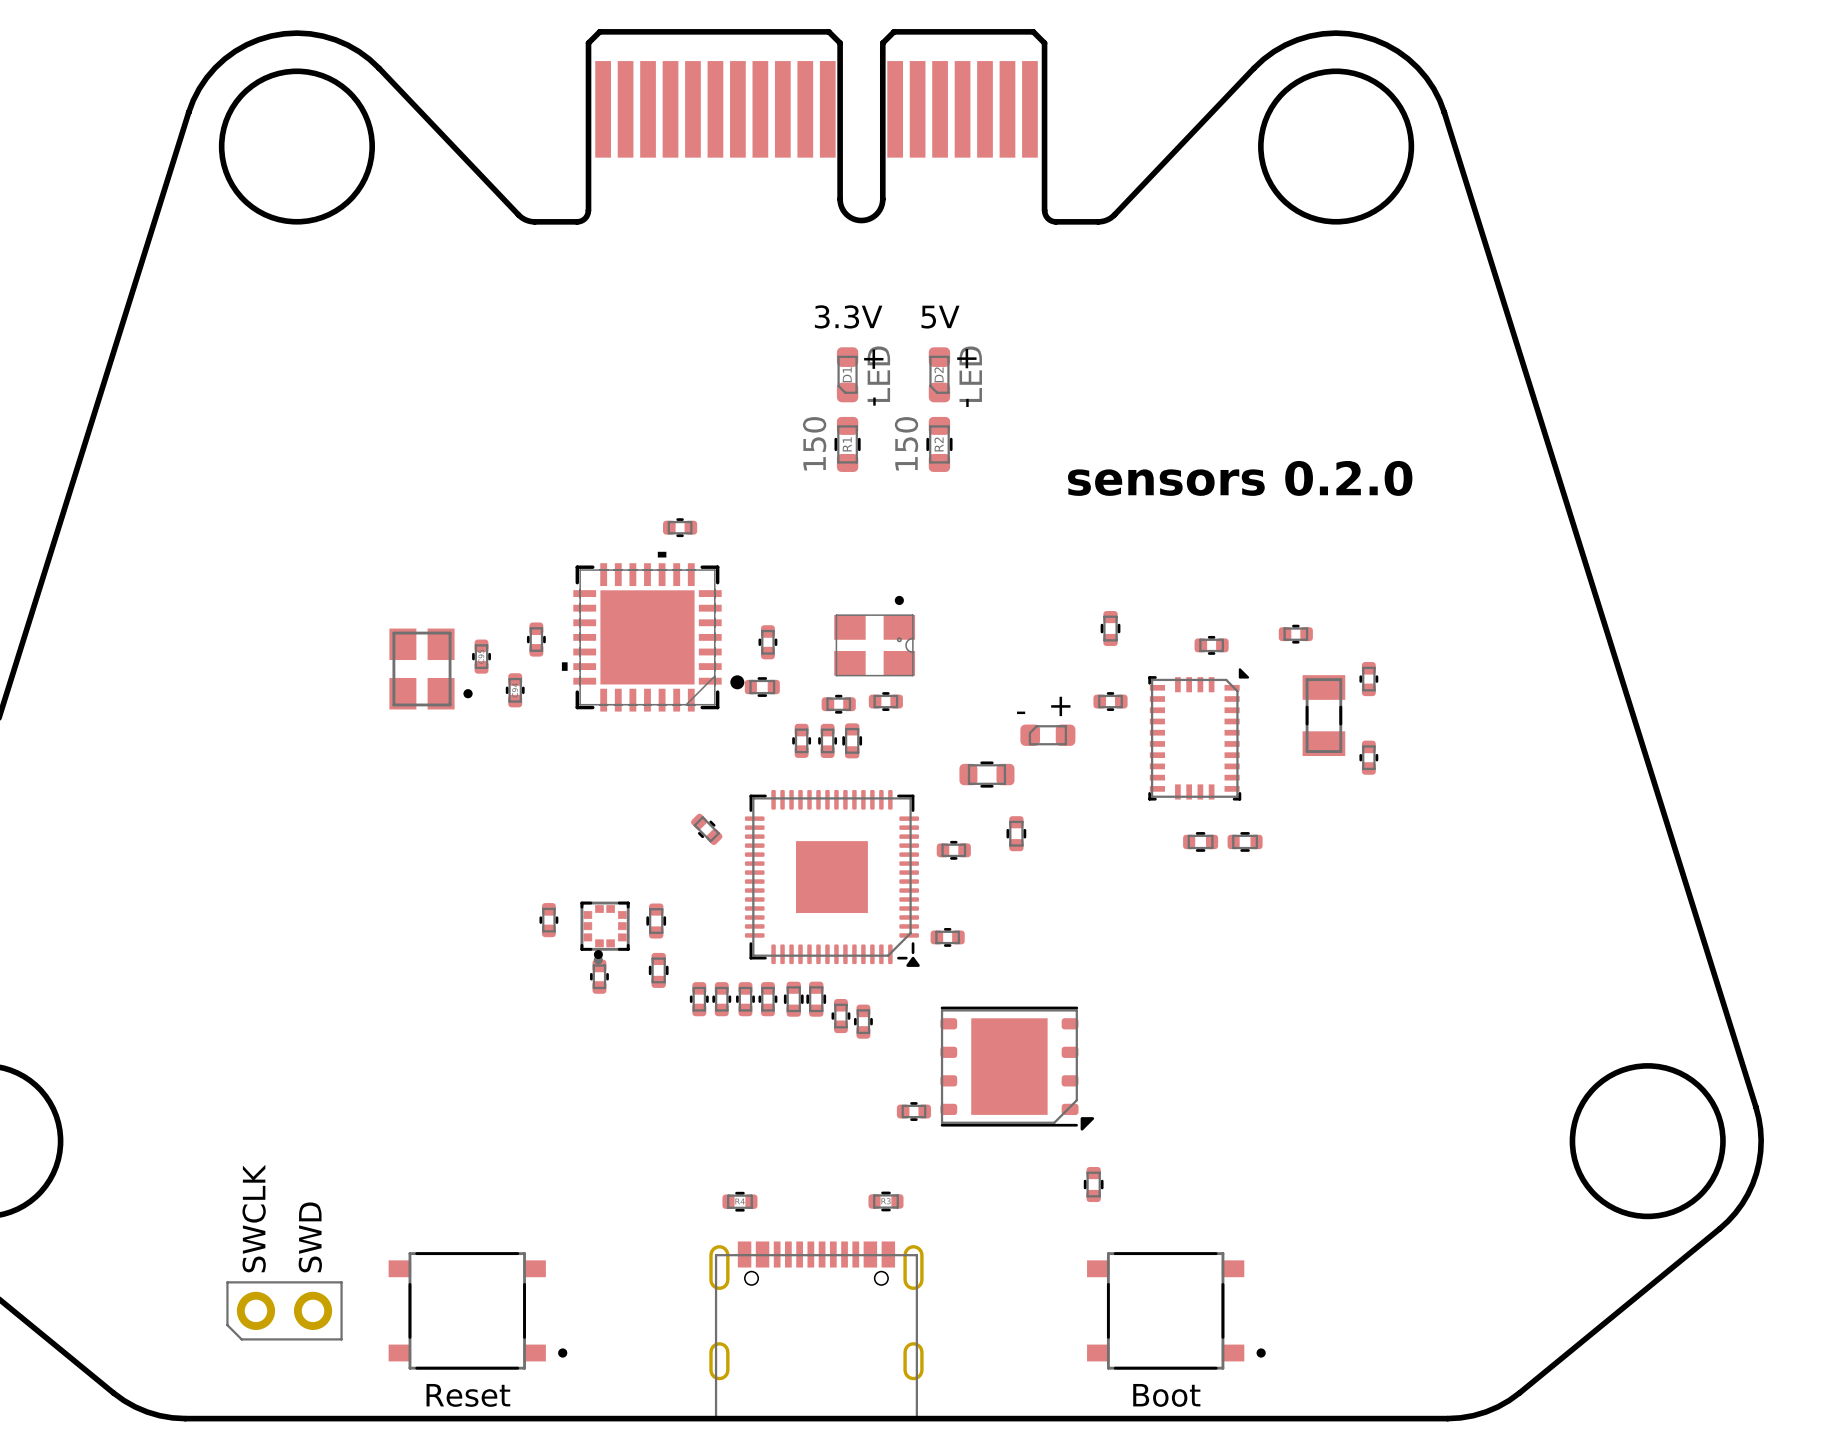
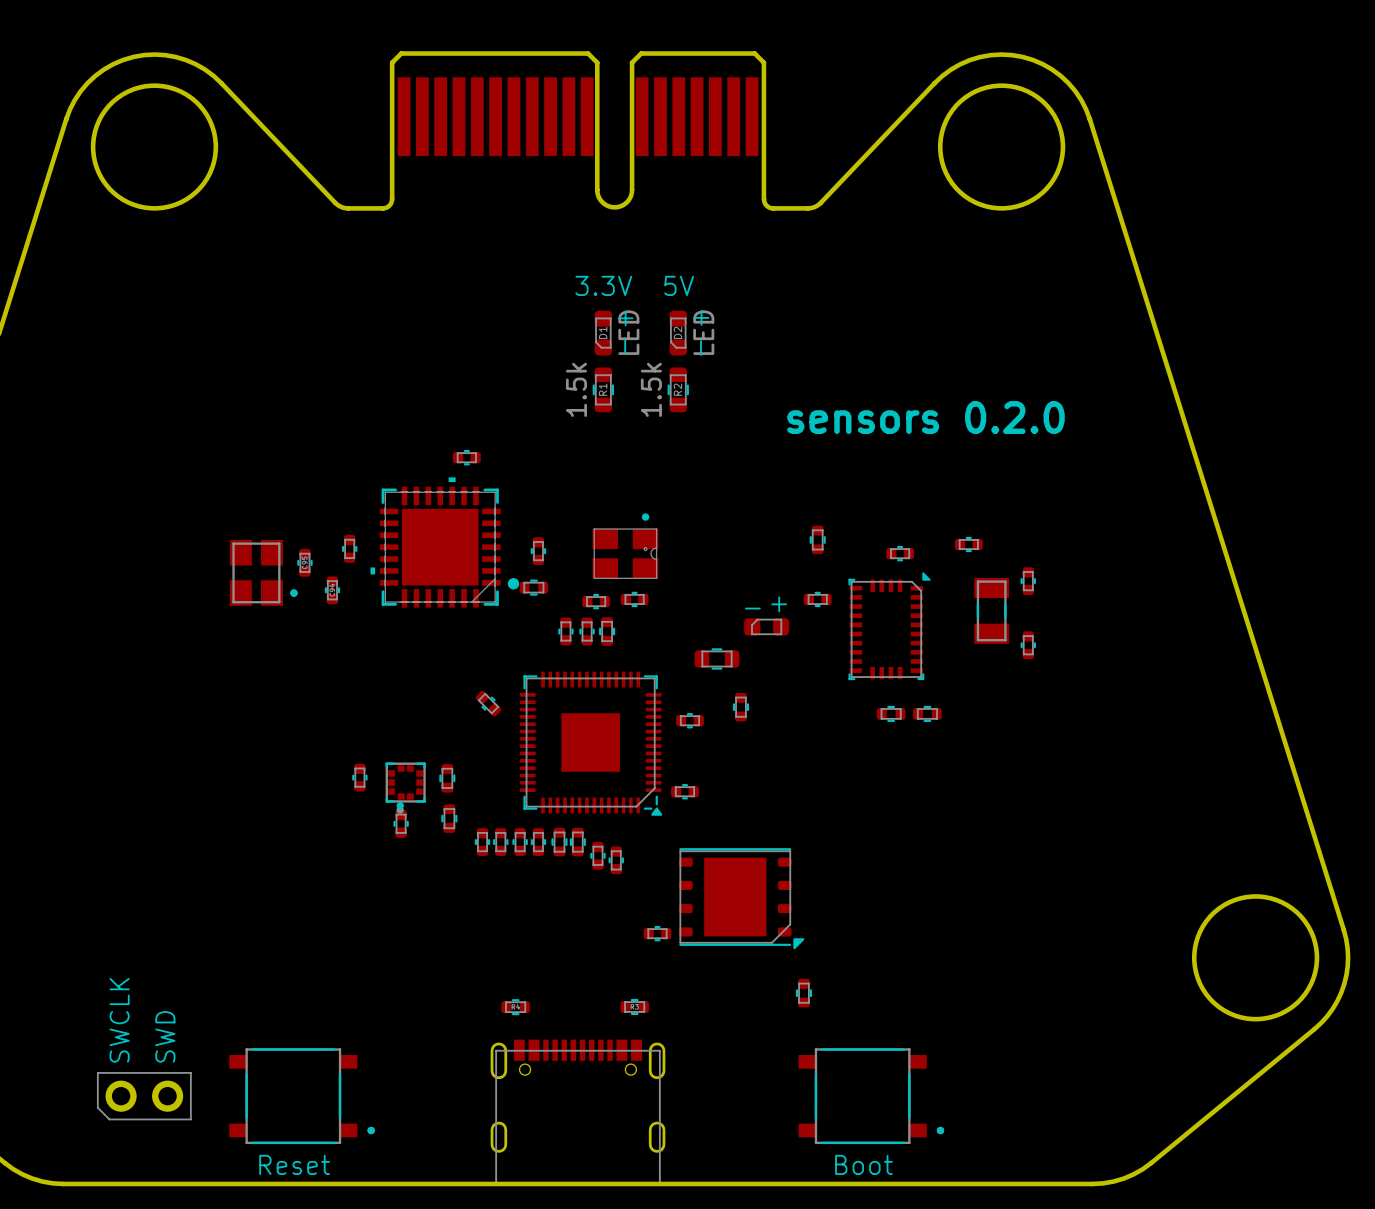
R1 value: 150 (814, 443) -> 1.5k (576, 389)
R2 value: 150 (906, 443) -> 1.5k (651, 389)

